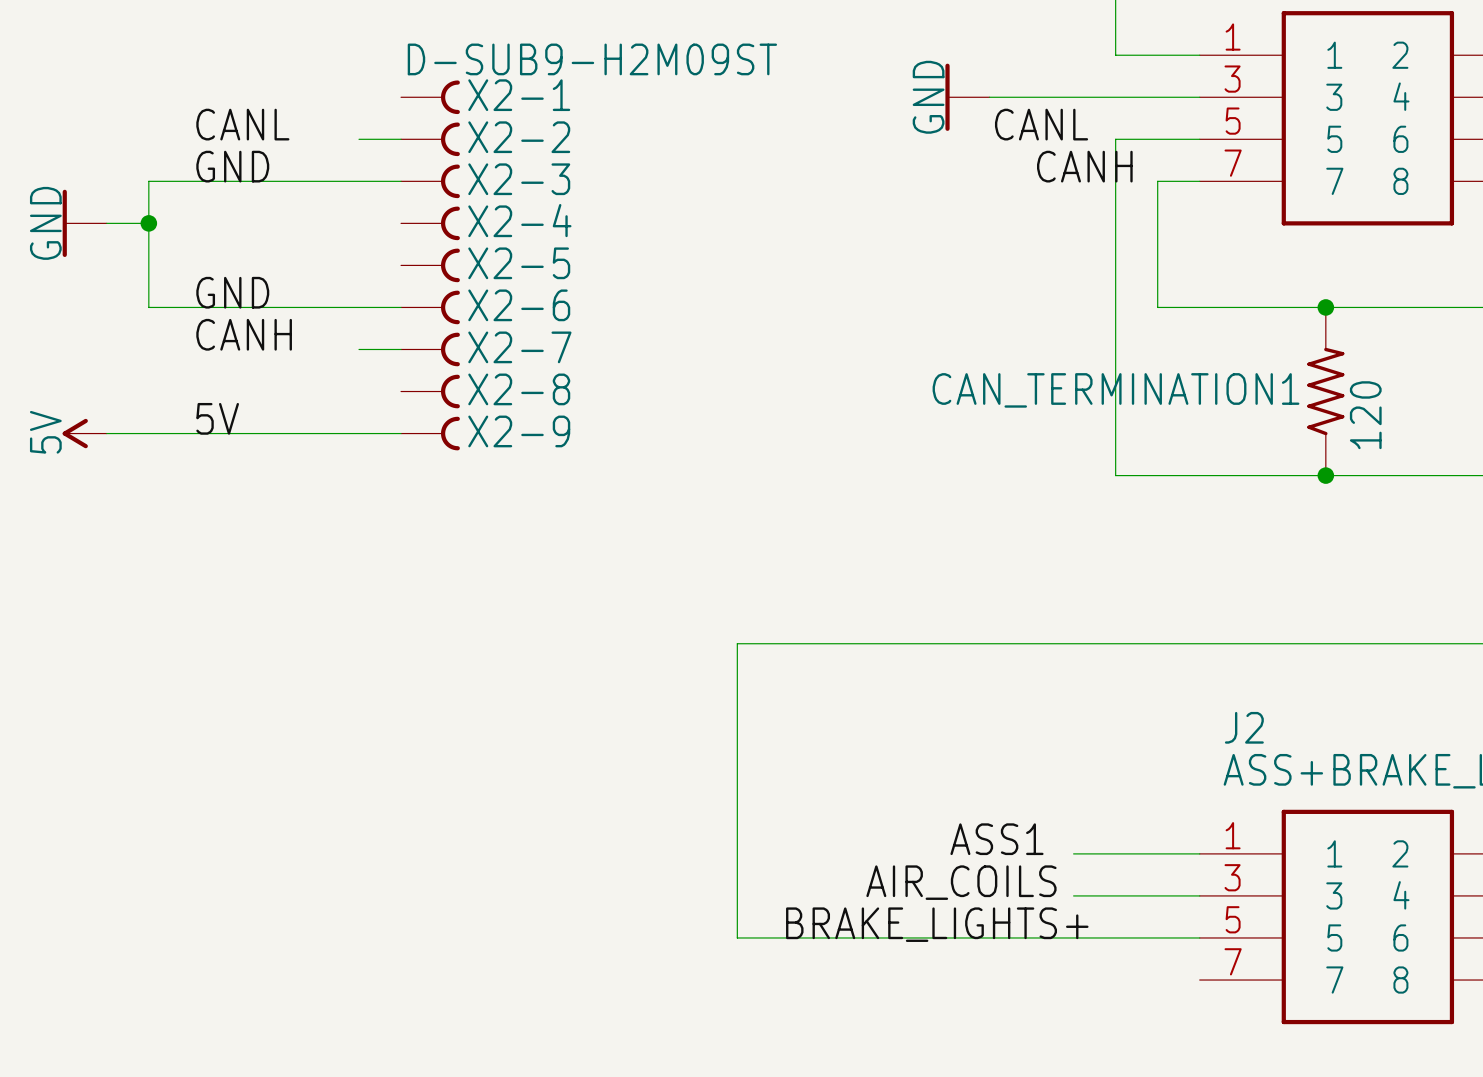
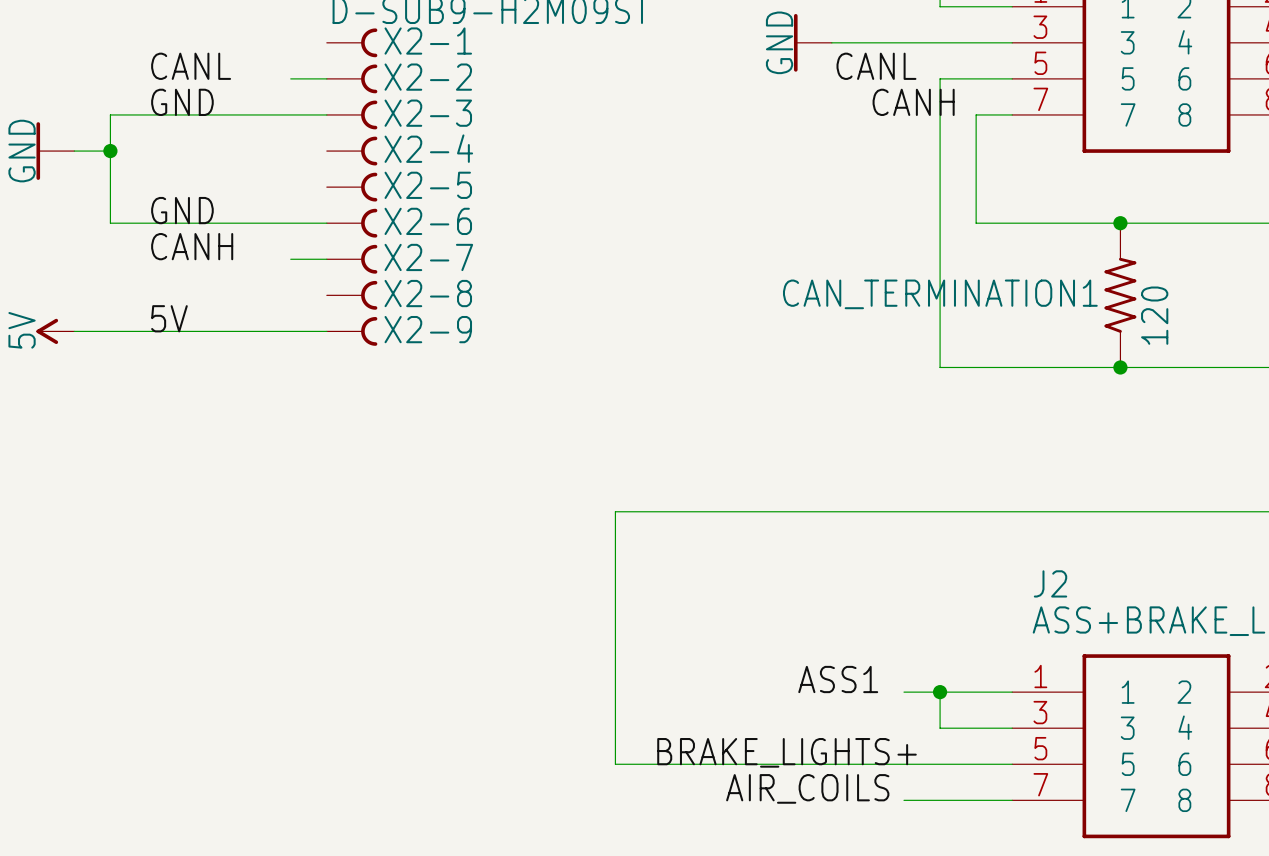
junction: none -> (940, 692)
label position: AIR_COILS (961, 882) -> AIR_COILS (807, 788)
wire: (1073, 895) (1115, 895) -> (940, 692) (940, 728)
wire: none -> (903, 800) (1012, 800)

